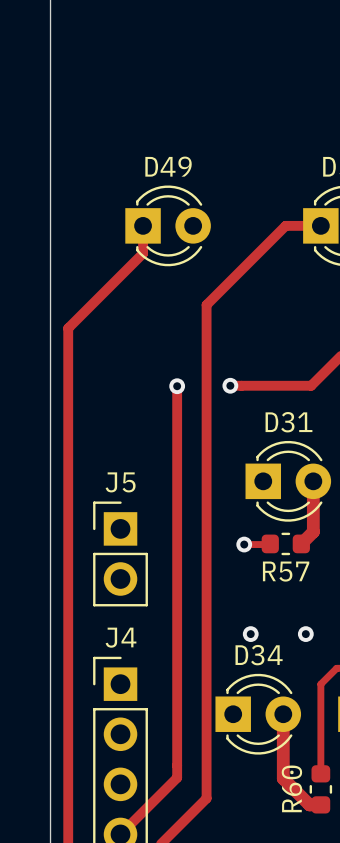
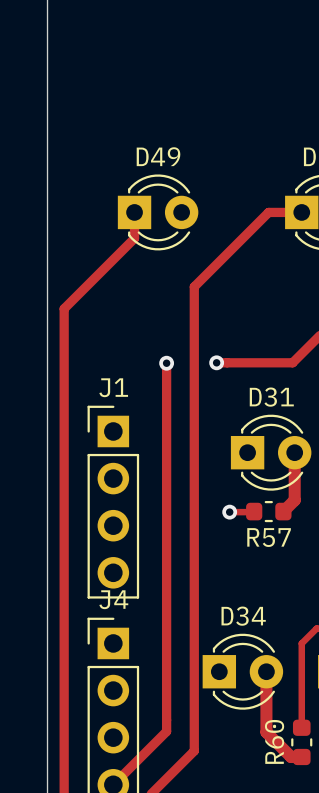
J1: none -> (113, 502)
J5: (120, 553) -> none
via: (250, 634) -> none
via: (305, 634) -> none

